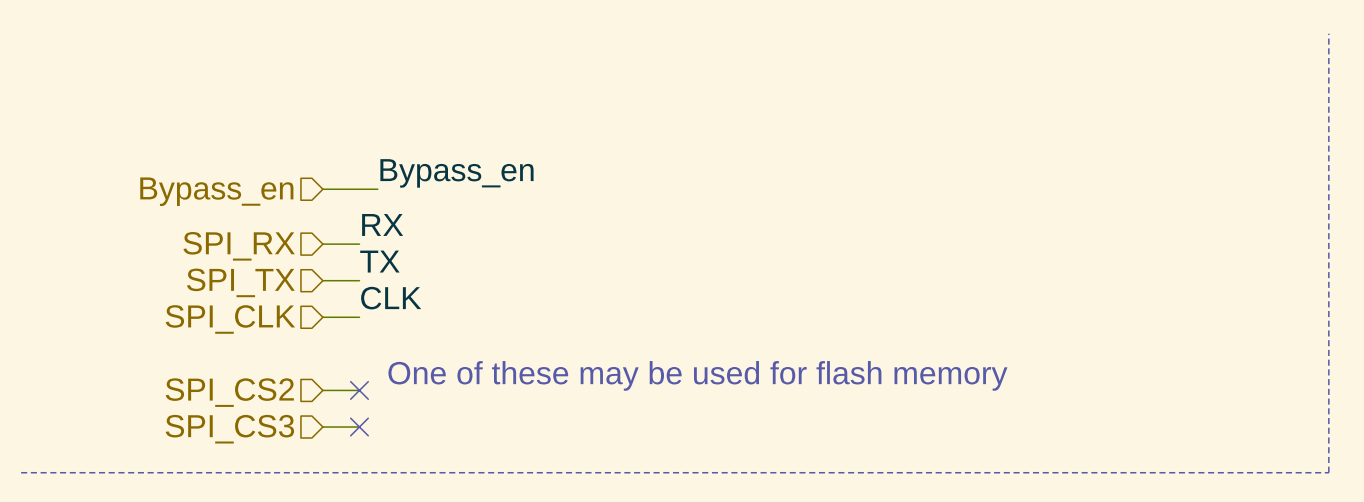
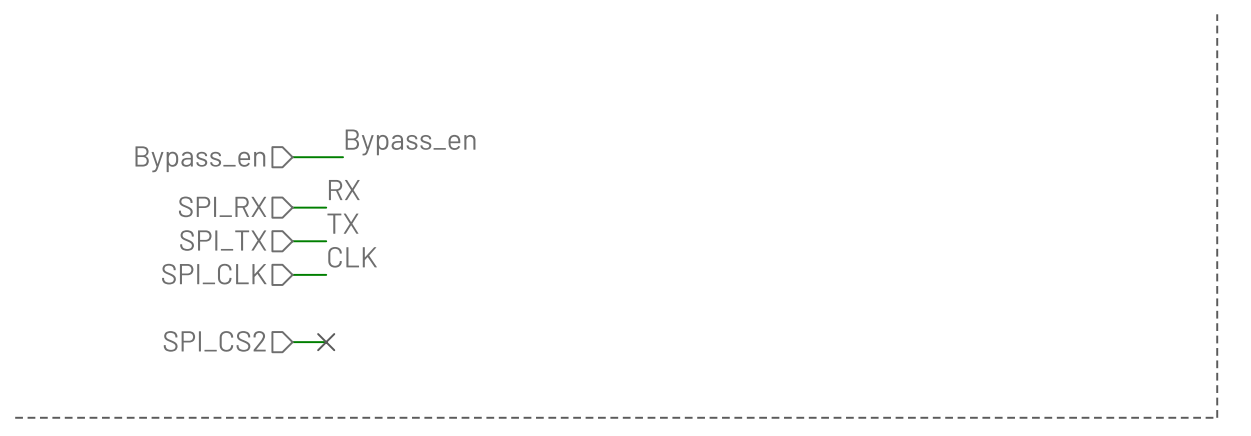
text: One of these may be used for flash memory (697, 375) -> none
wire: (322, 427) (359, 427) -> none
no-connect mark: (359, 427) -> none
hierarchical label: SPI_CS3 (229, 429) -> none

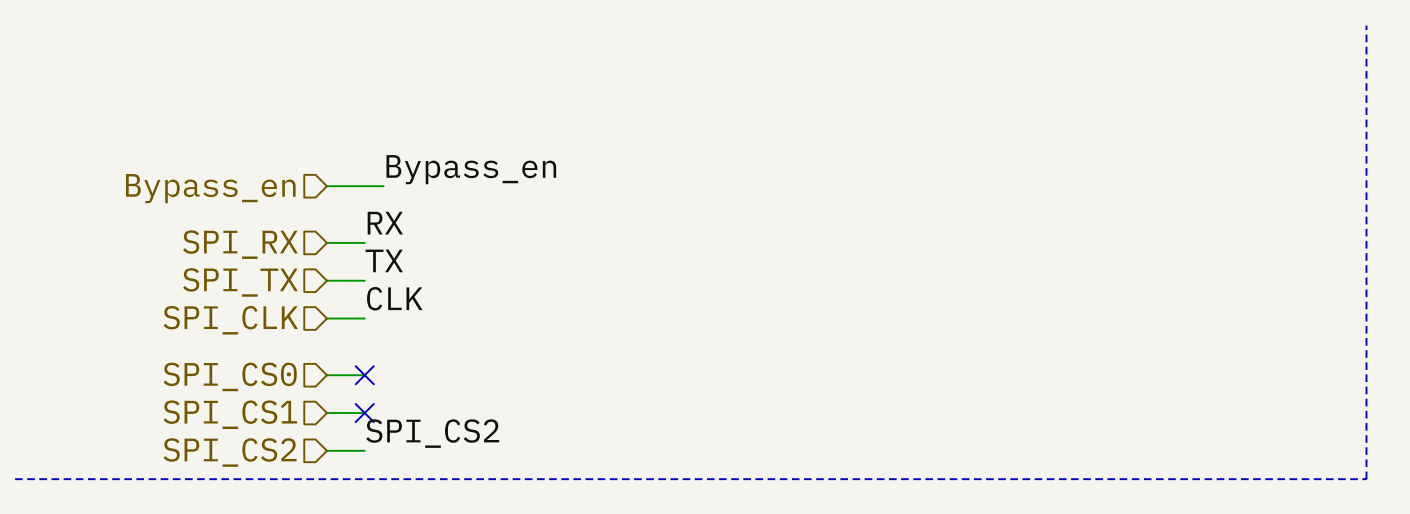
hierarchical label: none -> SPI_CS0 (230, 376)
no-connect mark: none -> (364, 375)
hierarchical label position: SPI_CS2 (214, 341) -> SPI_CS2 (230, 452)
wire: (292, 342) (326, 342) -> (326, 375) (364, 375)
no-connect mark: (326, 342) -> none
hierarchical label: none -> SPI_CS1 (230, 414)
wire: none -> (326, 413) (364, 413)
no-connect mark: none -> (364, 413)
label: none -> SPI_CS2 (432, 433)
wire: none -> (326, 450) (364, 450)

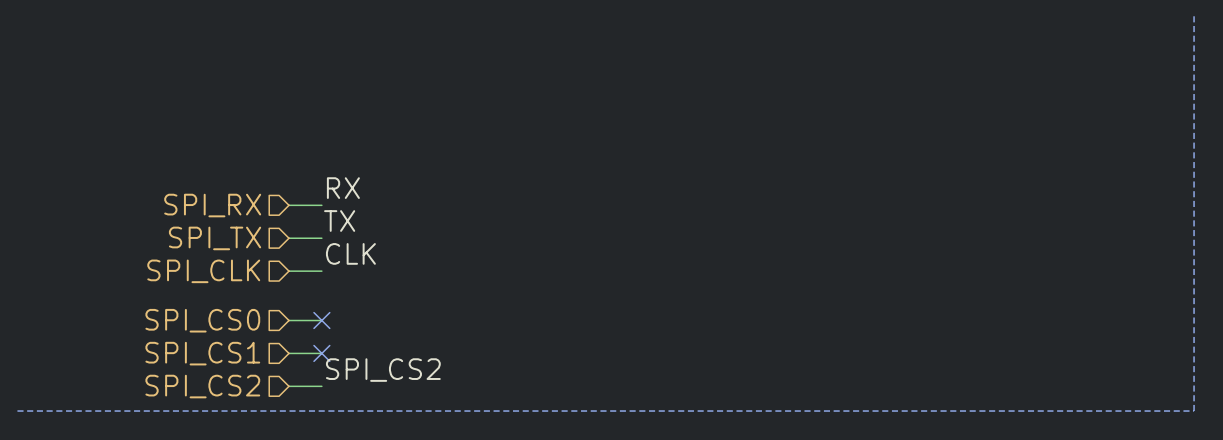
label: Bypass_en (471, 169) -> none
wire: (326, 186) (383, 186) -> none
hierarchical label: Bypass_en (210, 188) -> none

